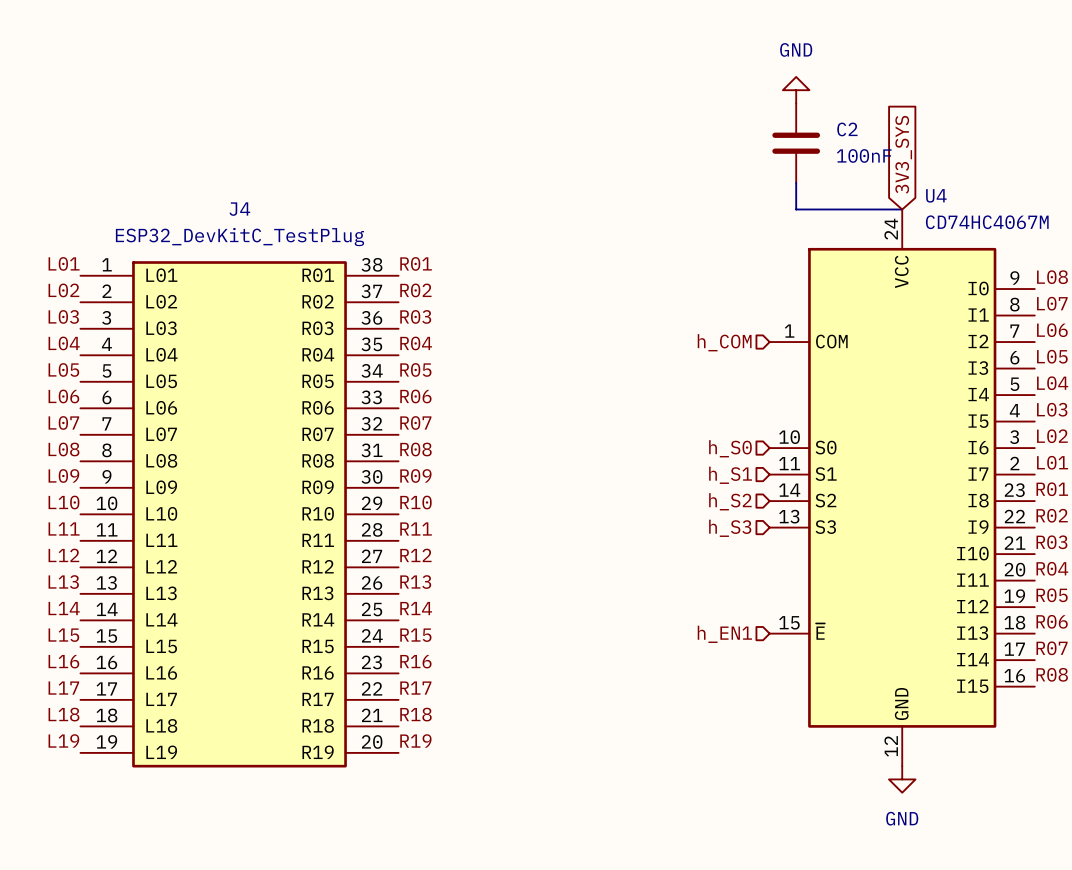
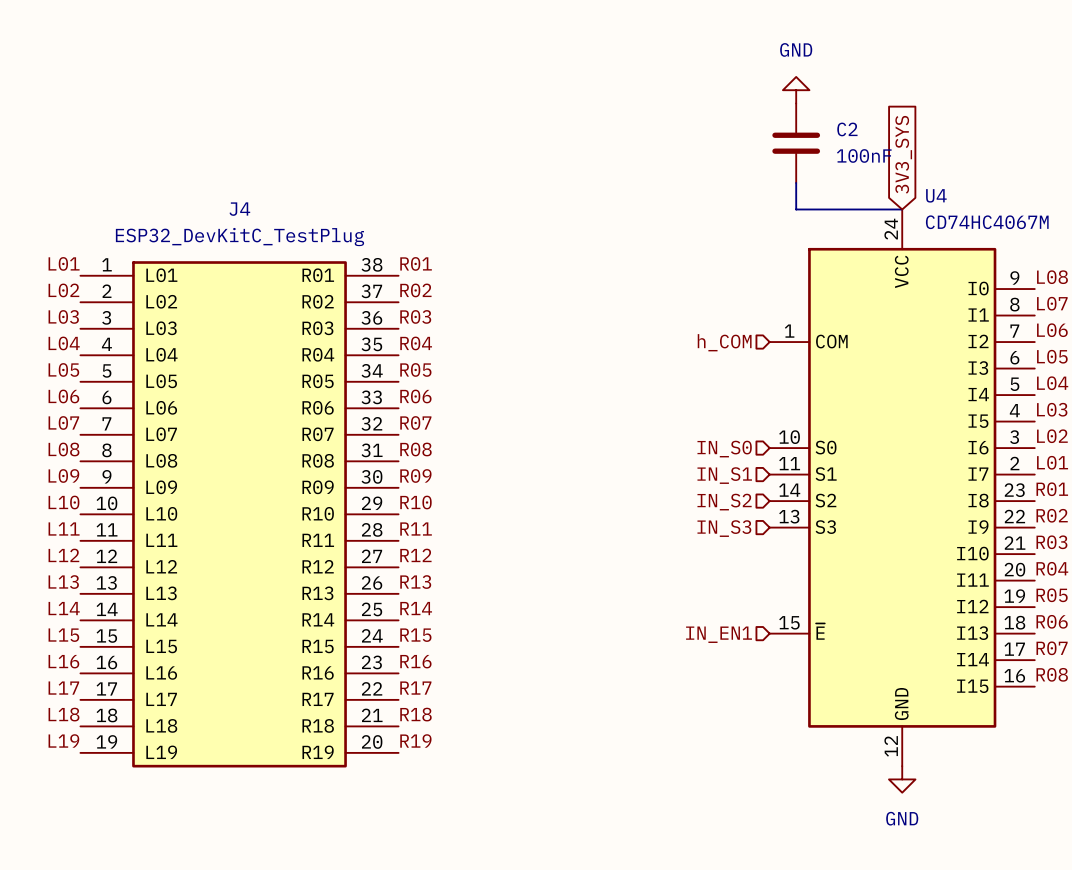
hierarchical label: h_S0 (730, 448) -> IN_S0 (724, 449)
hierarchical label: h_S1 (730, 475) -> IN_S1 (724, 475)
hierarchical label: h_S2 (730, 501) -> IN_S2 (724, 502)
hierarchical label: h_S3 (730, 528) -> IN_S3 (724, 528)
hierarchical label: h_EN1 (724, 634) -> IN_EN1 (719, 634)

